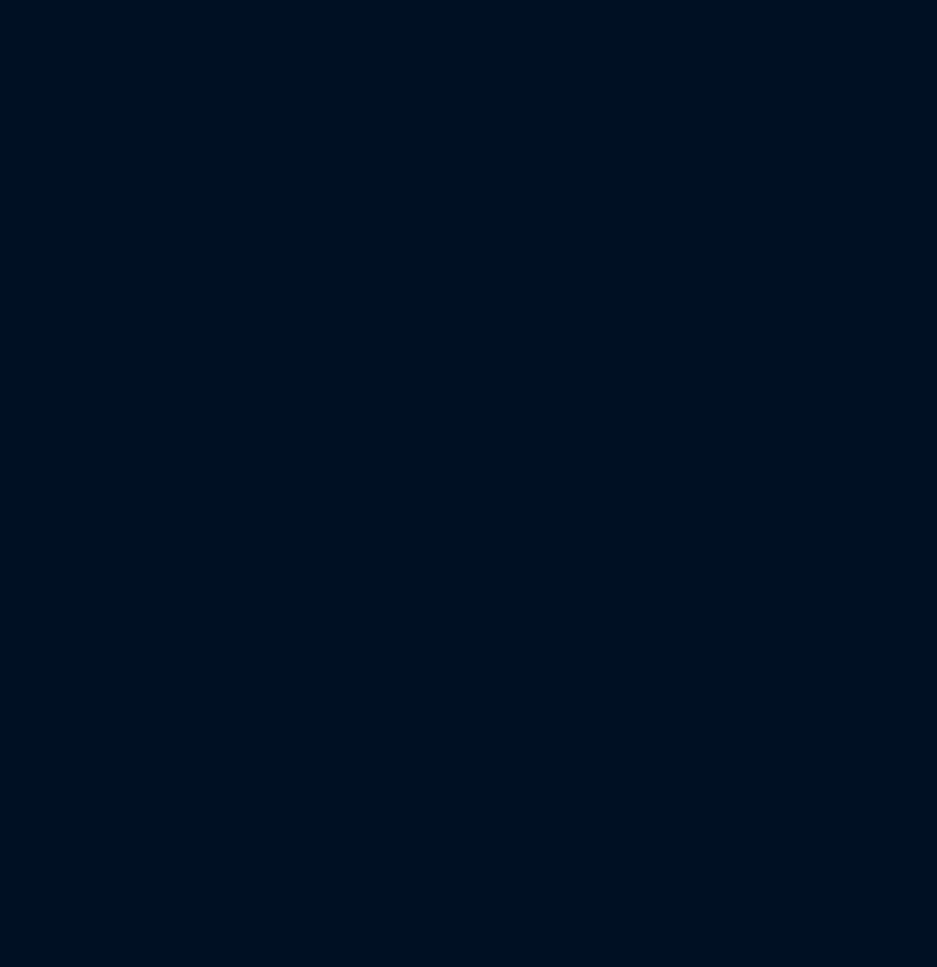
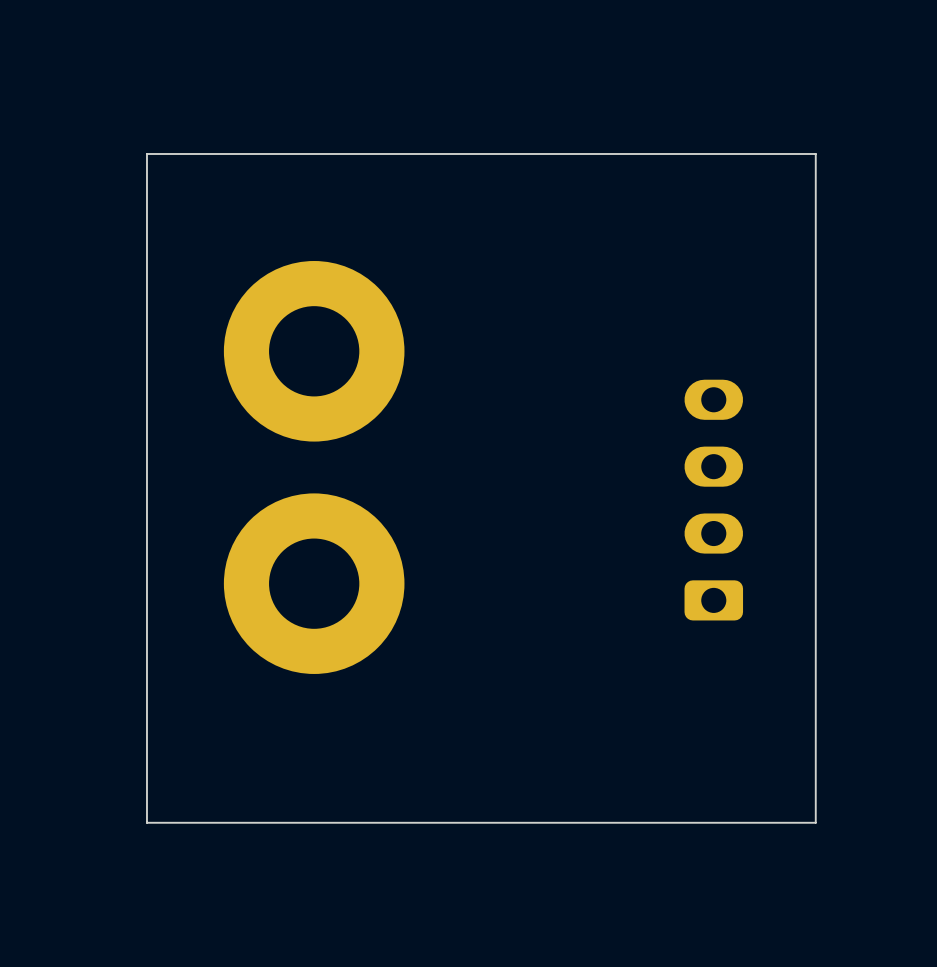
board edge: none -> (815, 153) (146, 153) (146, 822) (815, 822) (815, 153)
part: none -> (314, 351)
part: none -> (713, 500)
part: none -> (314, 583)

